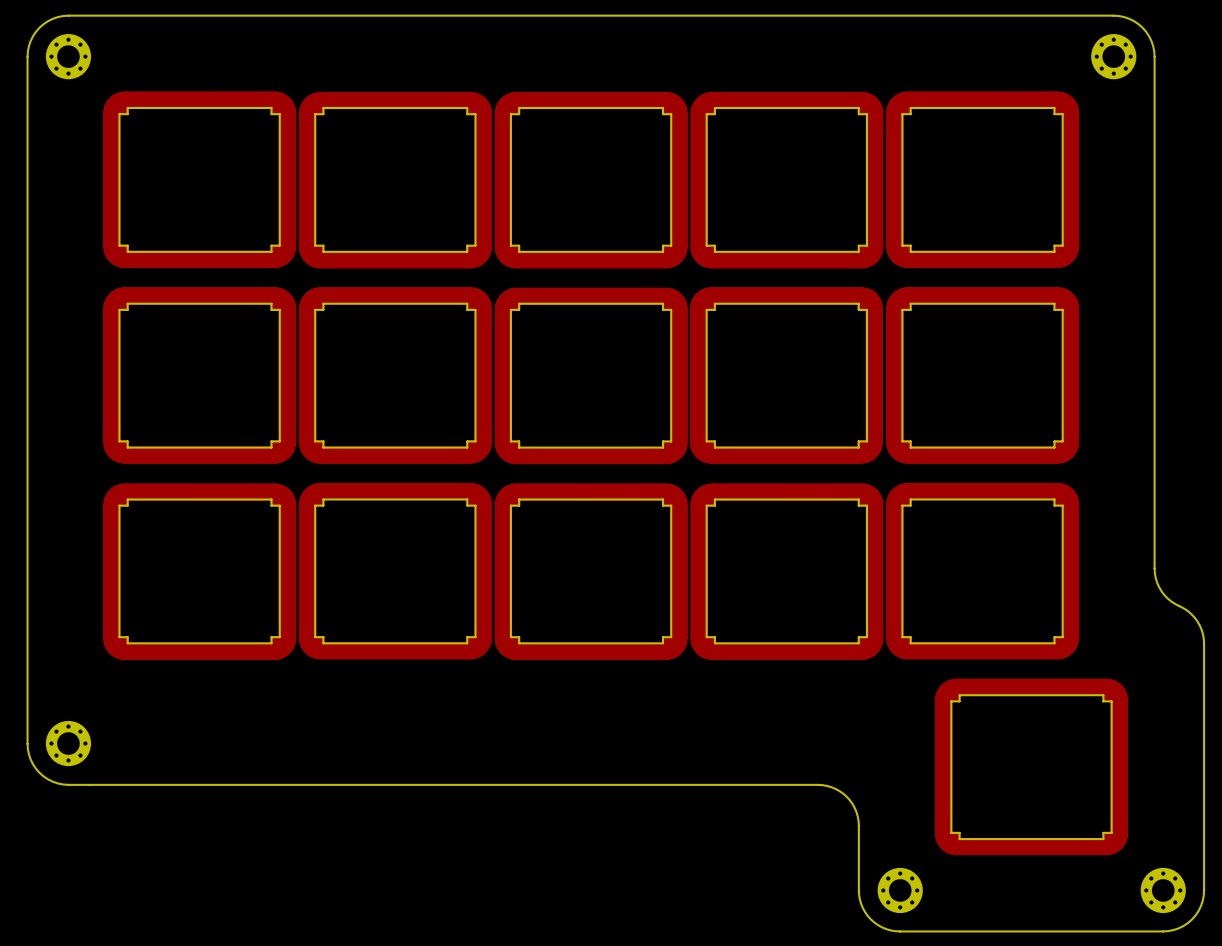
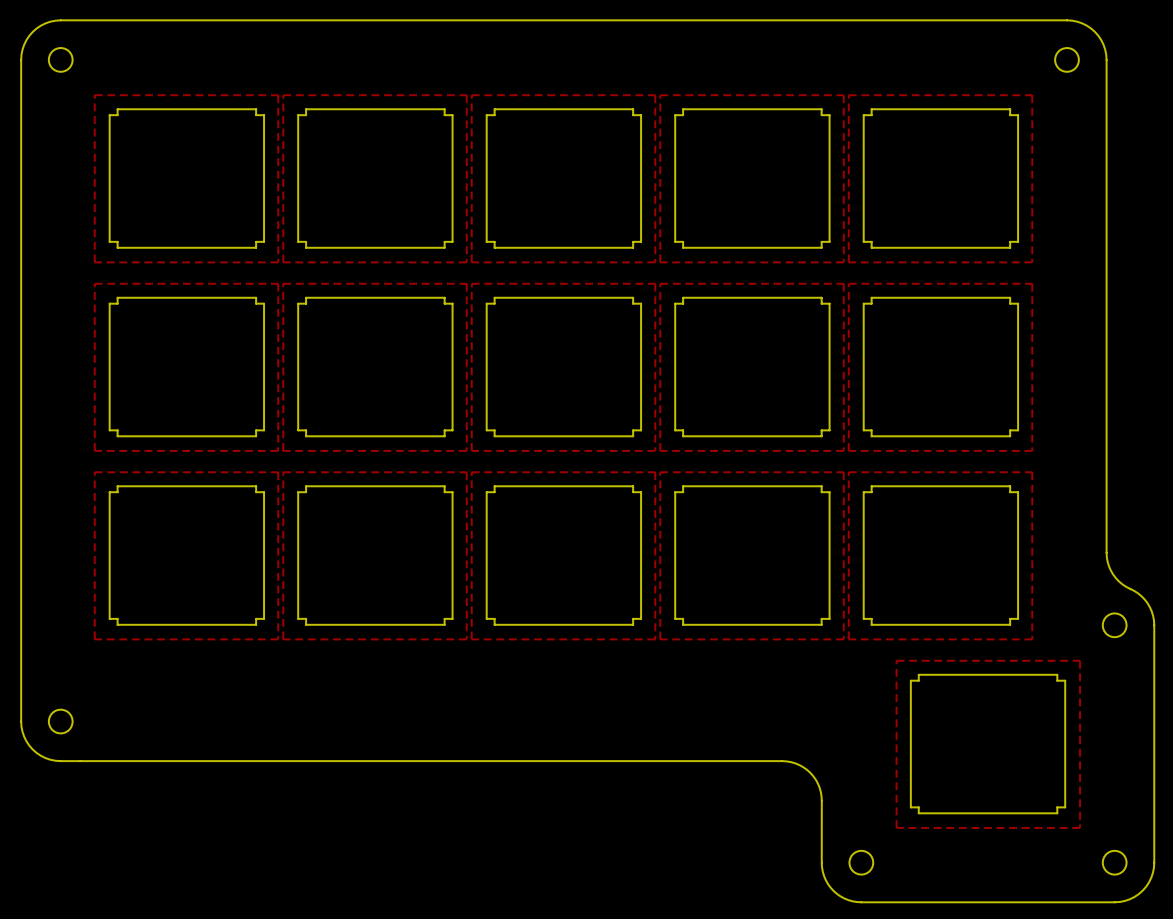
round board edge: none -> [47, 47, 74, 73]
round board edge: none -> [1054, 47, 1080, 73]
part: (68, 56) -> none
part: (1113, 56) -> none
drawing: [103, 91, 1080, 269] -> none
zone outline: none -> (94, 95) (94, 262) (278, 262) (278, 95) (94, 95)
zone outline: none -> (283, 95) (283, 262) (466, 262) (466, 95) (283, 95)
zone outline: none -> (471, 95) (471, 262) (655, 262) (655, 95) (471, 95)
zone outline: none -> (660, 95) (660, 262) (843, 262) (843, 95) (660, 95)
zone outline: none -> (848, 95) (848, 262) (1032, 262) (1032, 95) (848, 95)
drawing: [103, 287, 1080, 465] -> none
zone outline: none -> (94, 283) (94, 450) (278, 450) (278, 283) (94, 283)
zone outline: none -> (283, 283) (283, 450) (466, 450) (466, 283) (283, 283)
zone outline: none -> (471, 283) (471, 450) (655, 450) (655, 283) (471, 283)
zone outline: none -> (660, 283) (660, 450) (843, 450) (843, 283) (660, 283)
zone outline: none -> (848, 283) (848, 450) (1032, 450) (1032, 283) (848, 283)
drawing: [103, 483, 1080, 660] -> none
zone outline: none -> (94, 472) (278, 472) (278, 639) (94, 639) (94, 472)
zone outline: none -> (283, 472) (466, 472) (466, 639) (283, 639) (283, 472)
zone outline: none -> (471, 472) (655, 472) (655, 639) (471, 639) (471, 472)
zone outline: none -> (660, 472) (843, 472) (843, 639) (660, 639) (660, 472)
zone outline: none -> (848, 472) (1032, 472) (1032, 639) (848, 639) (848, 472)
round board edge: none -> [1101, 612, 1128, 639]
drawing: [935, 678, 1128, 855] -> none
zone outline: none -> (896, 660) (1080, 660) (1080, 827) (896, 827) (896, 660)
round board edge: none -> [47, 708, 74, 735]
part: (68, 743) -> none
round board edge: none -> [848, 849, 875, 876]
round board edge: none -> [1101, 849, 1128, 876]
part: (900, 890) -> none
part: (1163, 890) -> none

